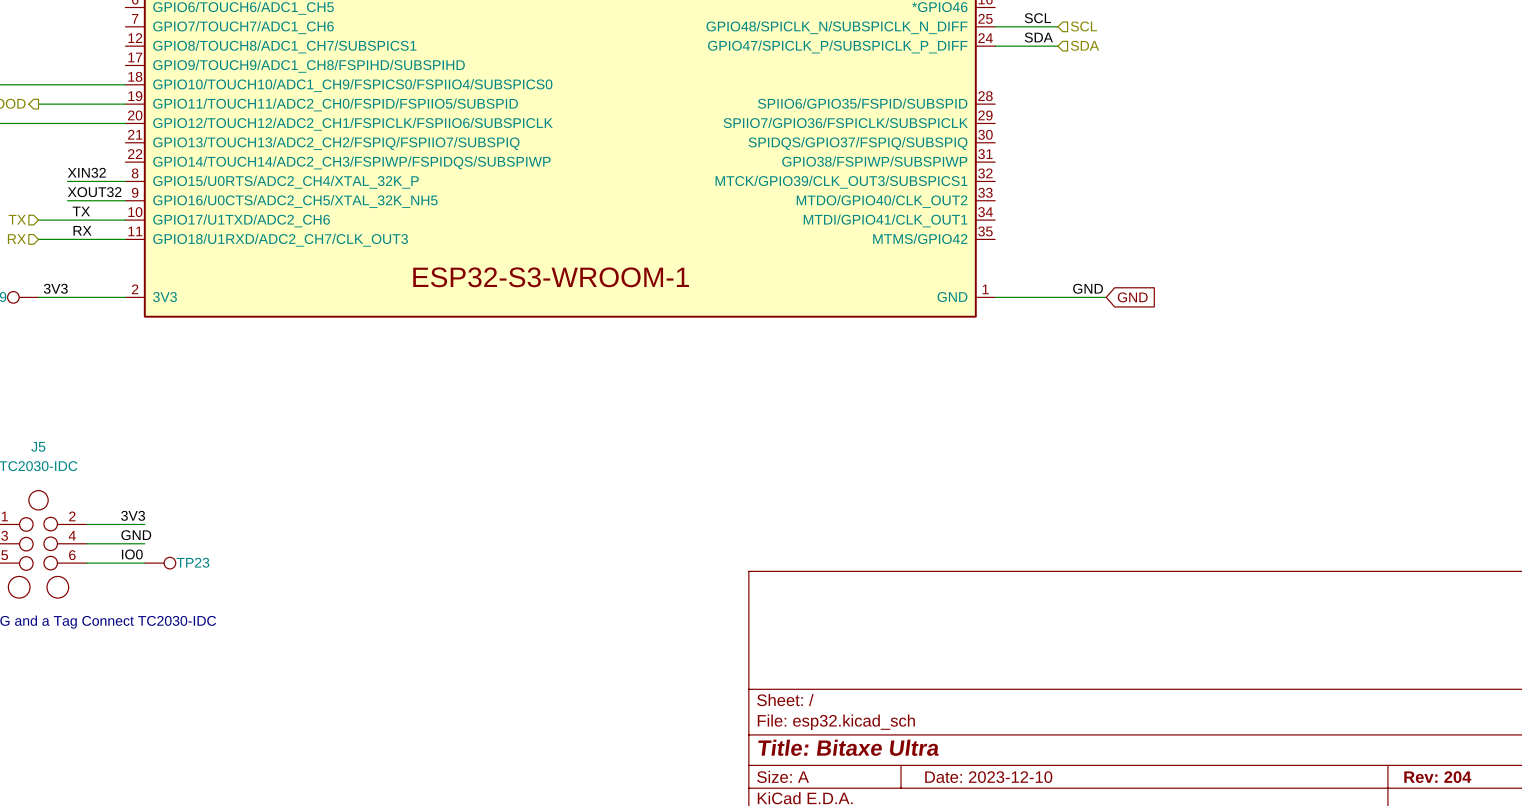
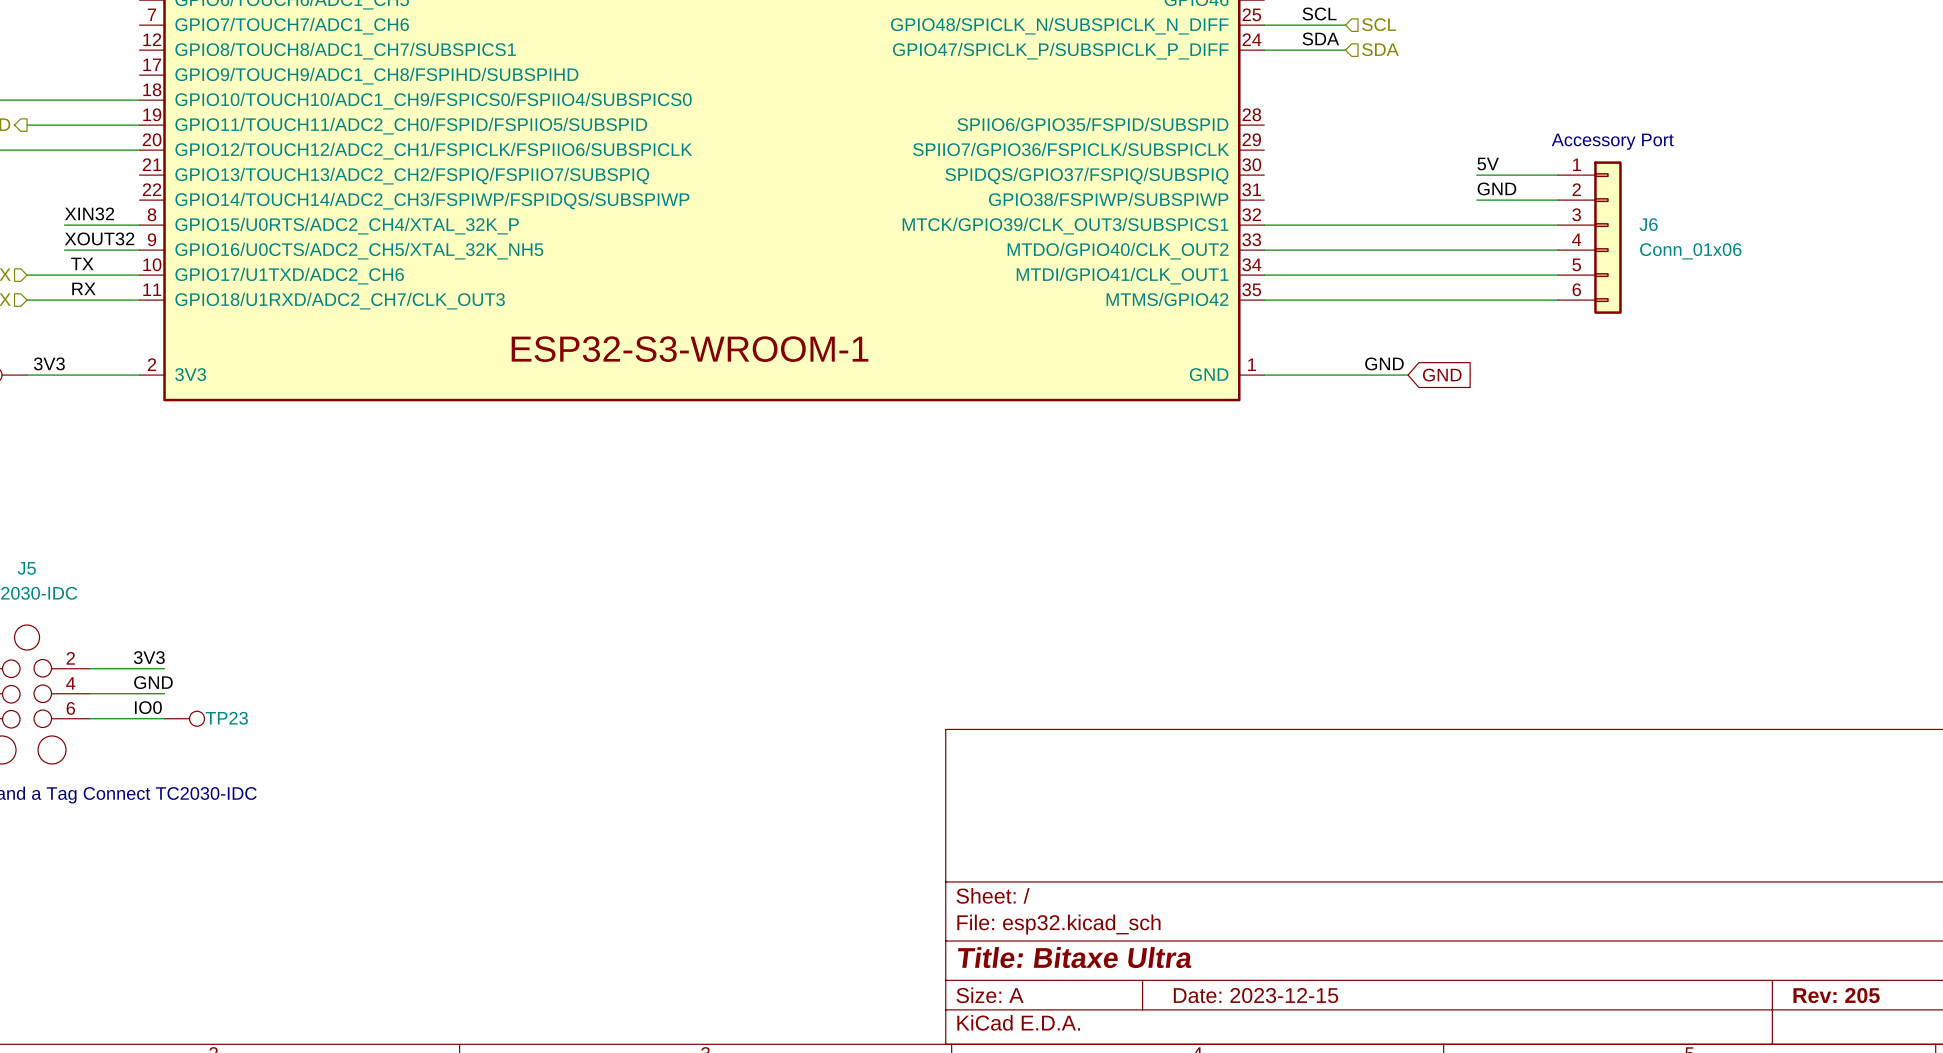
text: none -> Accessory Port (1612, 141)
label: none -> 5V (1488, 164)
wire: none -> (1476, 175) (1557, 175)
label: none -> GND (1496, 188)
wire: none -> (1476, 200) (1557, 200)
wire: none -> (1264, 225) (1557, 225)
J6: none -> Conn_01x06 (1589, 237)
wire: none -> (1264, 250) (1557, 250)
wire: none -> (1264, 275) (1557, 275)
wire: none -> (1264, 300) (1557, 300)
title block: Date: 2023-12-10 (988, 777) -> Date: 2023-12-15 (1256, 995)
title block: Rev: 204 (1437, 777) -> Rev: 205 (1836, 995)

